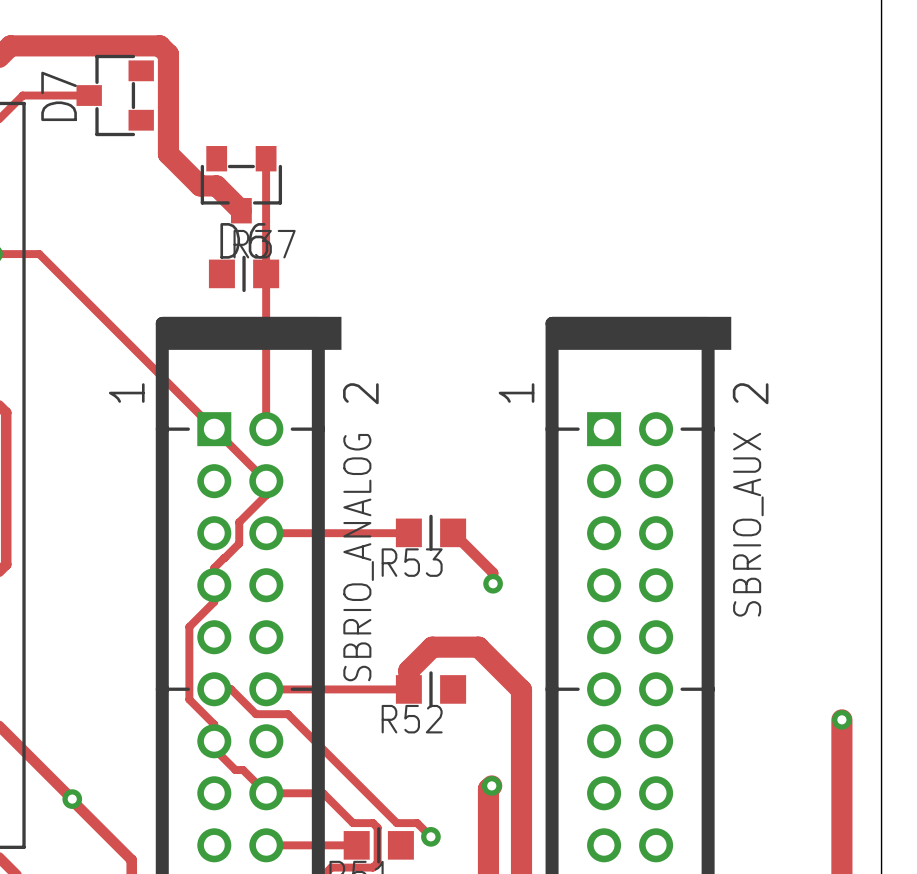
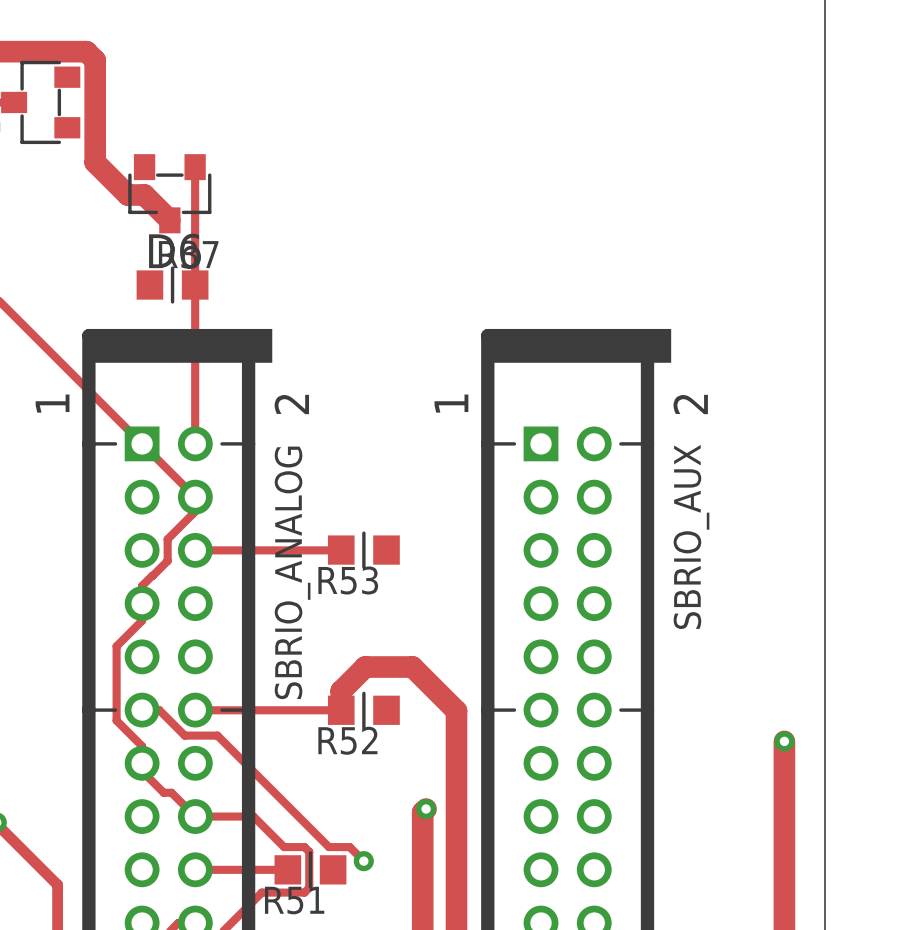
track: (453, 532) (493, 572) (493, 583) -> none
via: (493, 583) -> none

